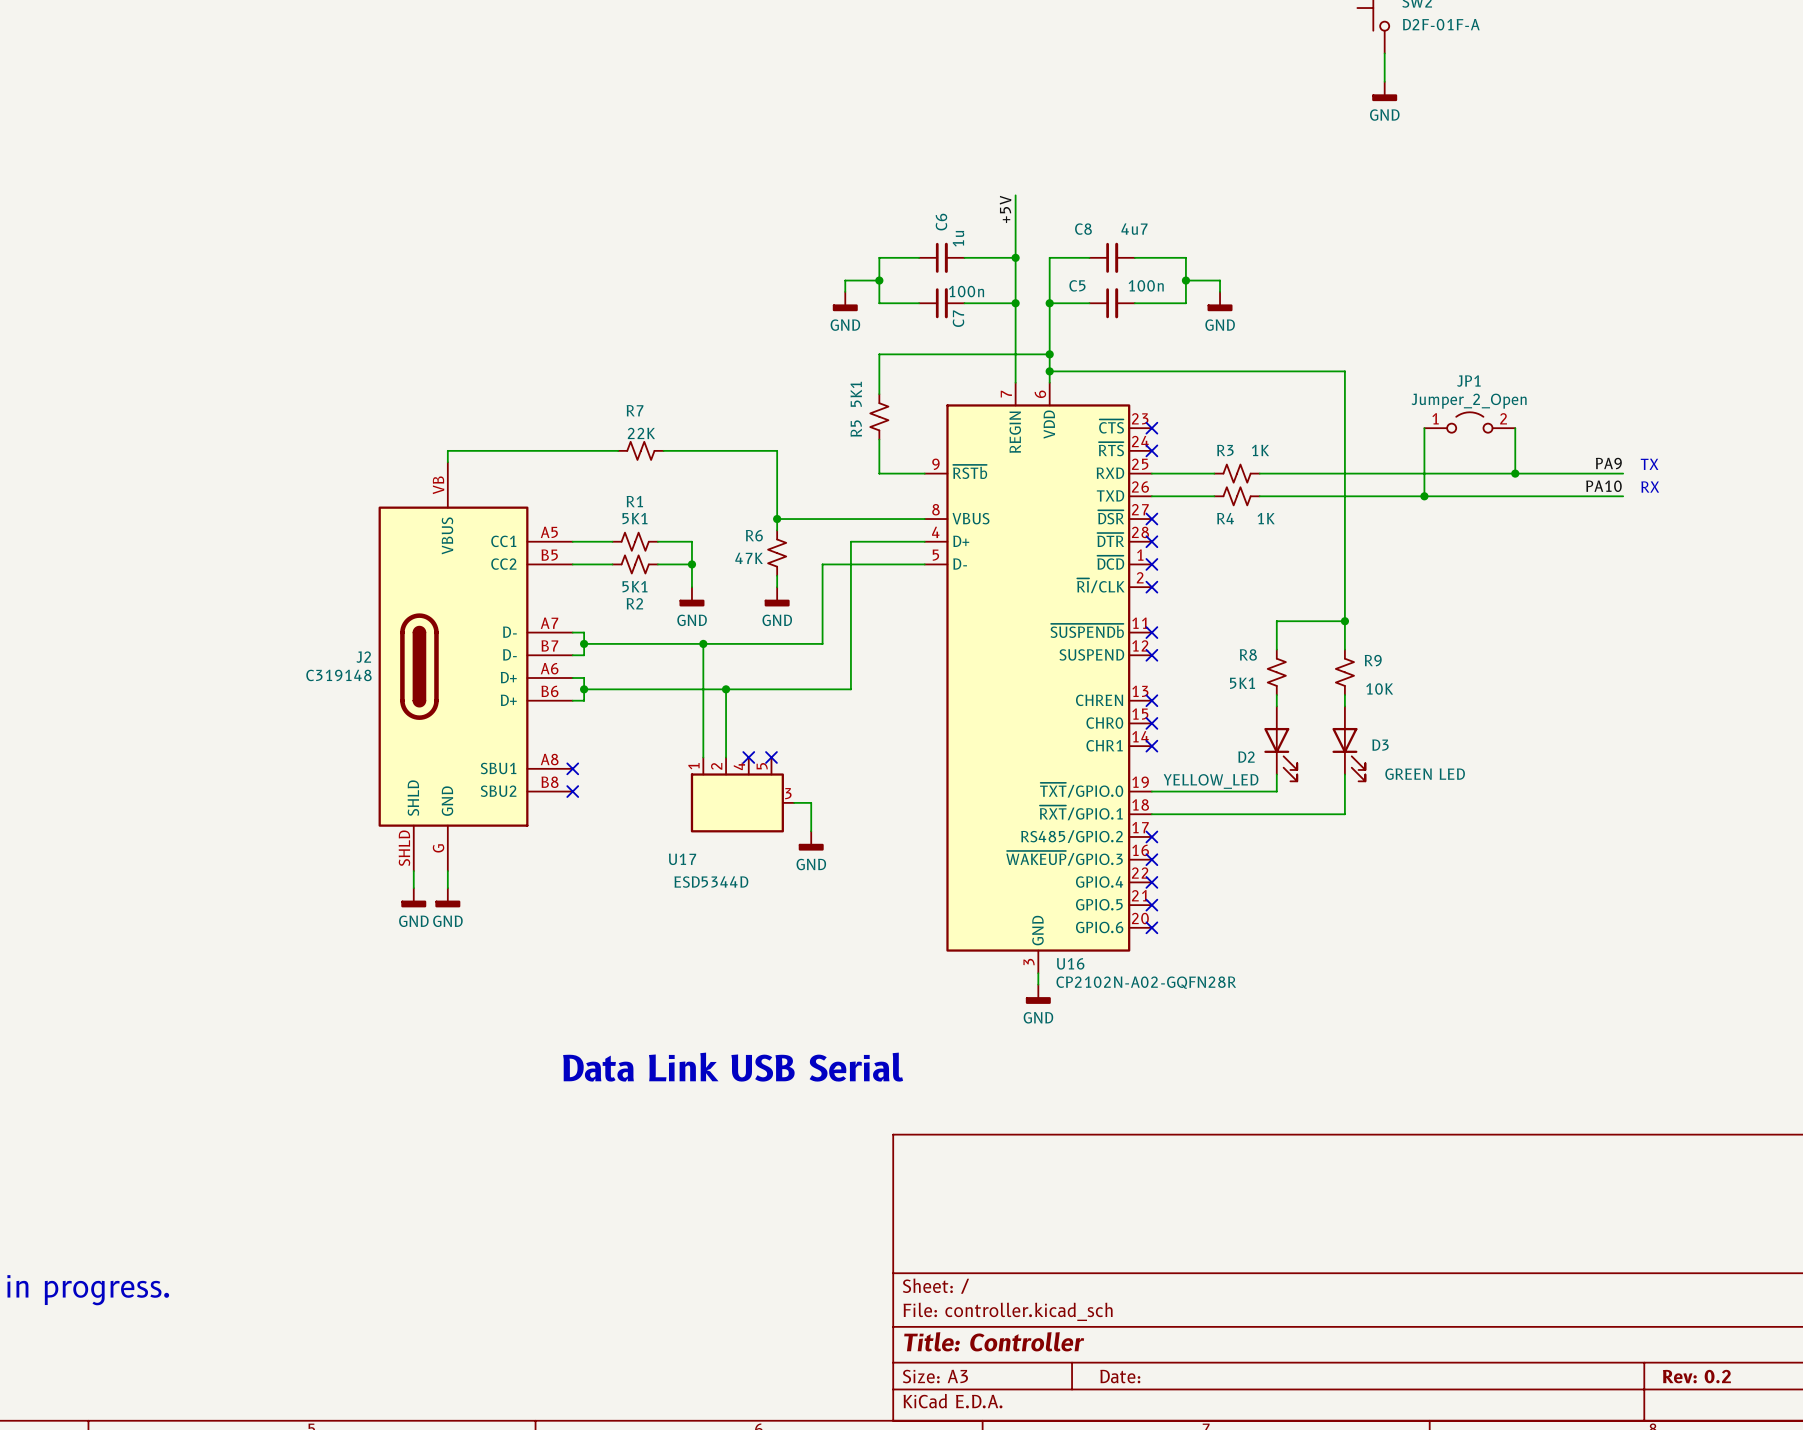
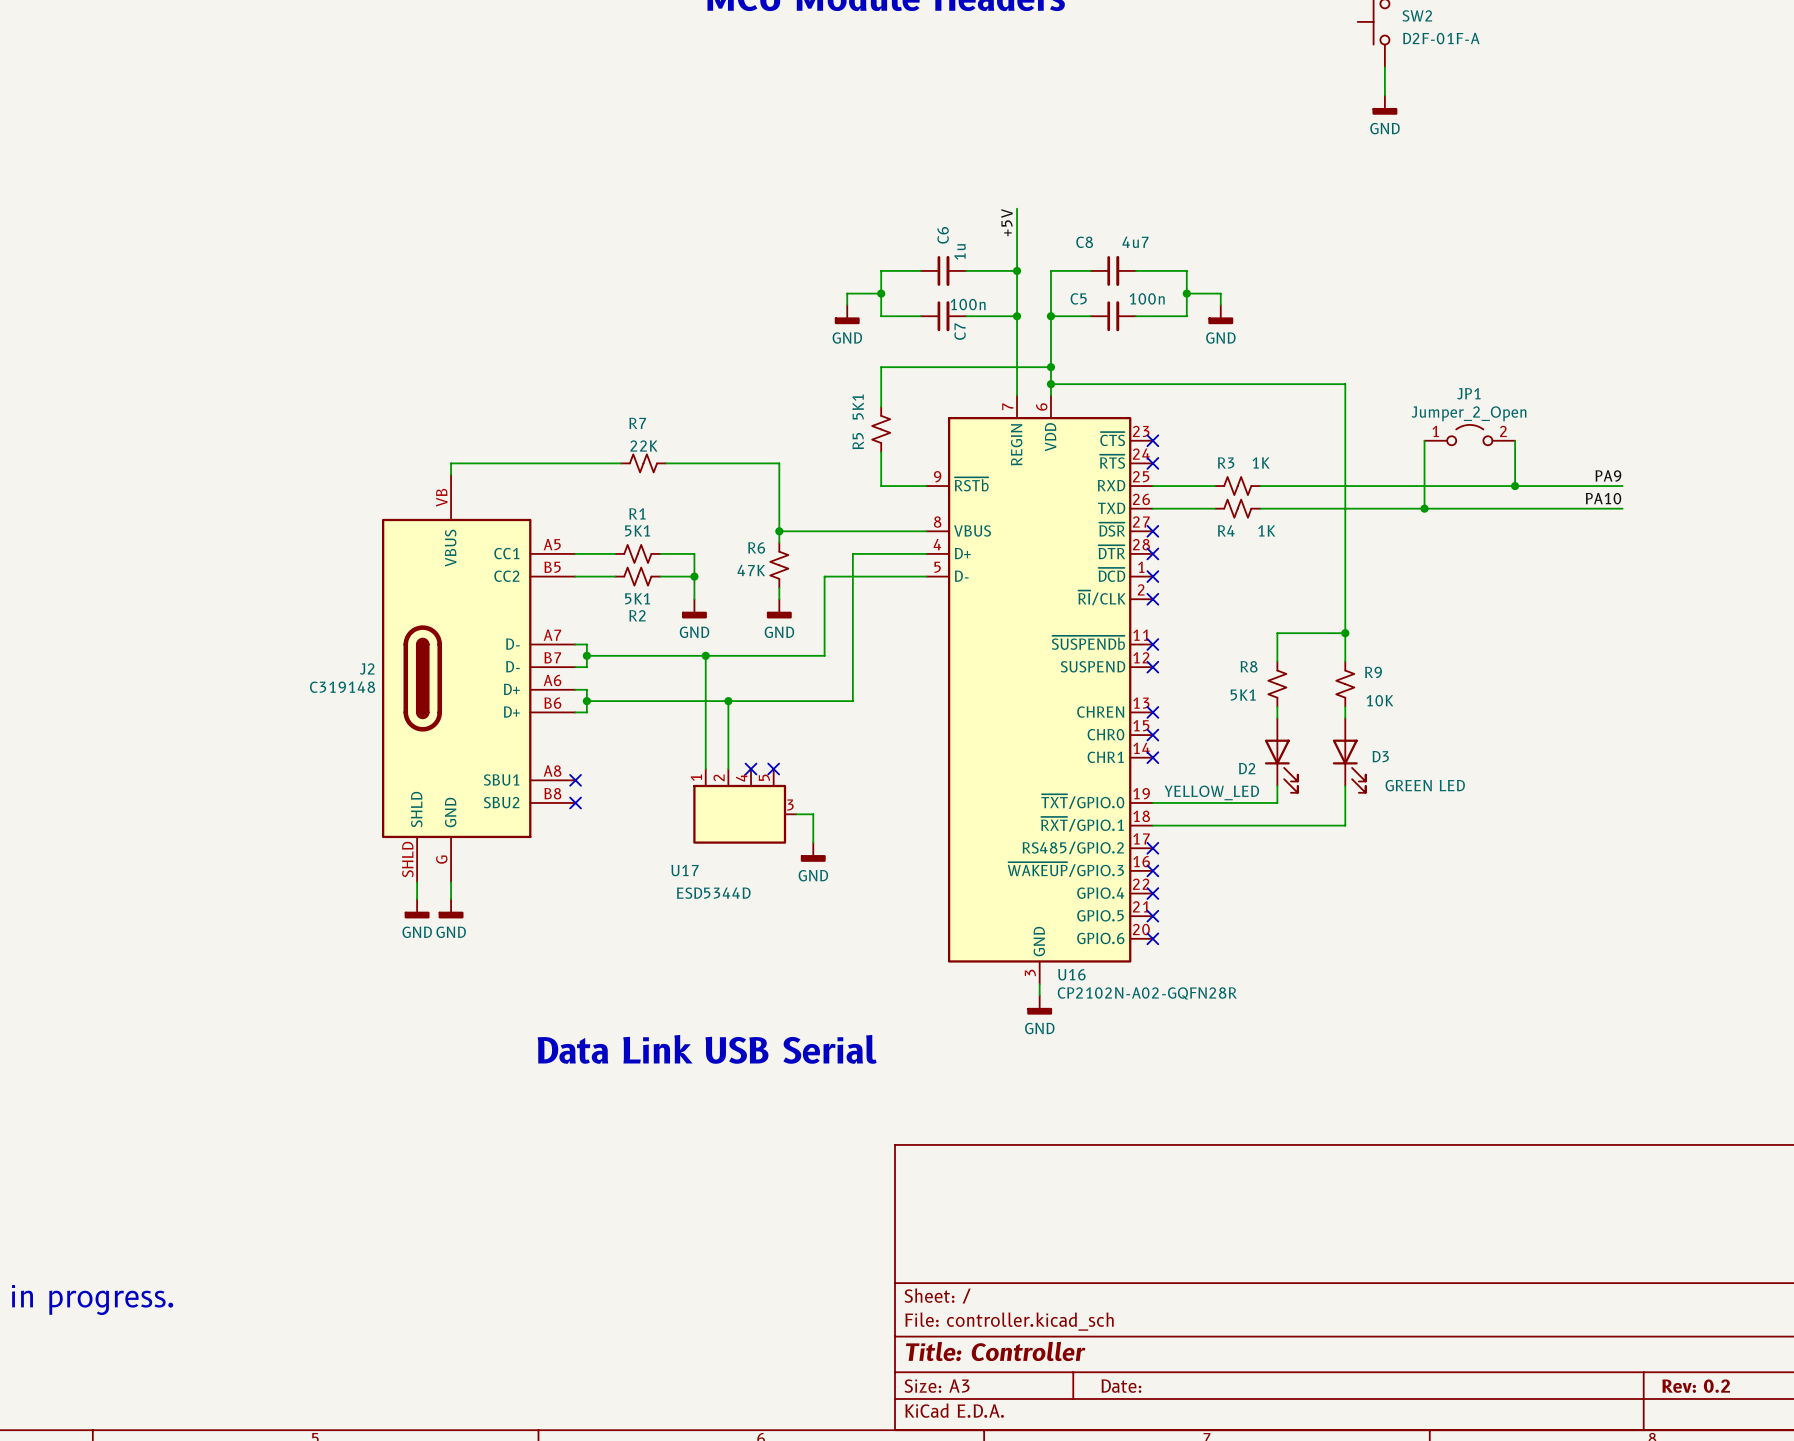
text: TX (1649, 464) -> none
text: RX (1650, 487) -> none
text position: Data Link USB Serial (733, 1067) -> Data Link USB Serial (707, 1049)

